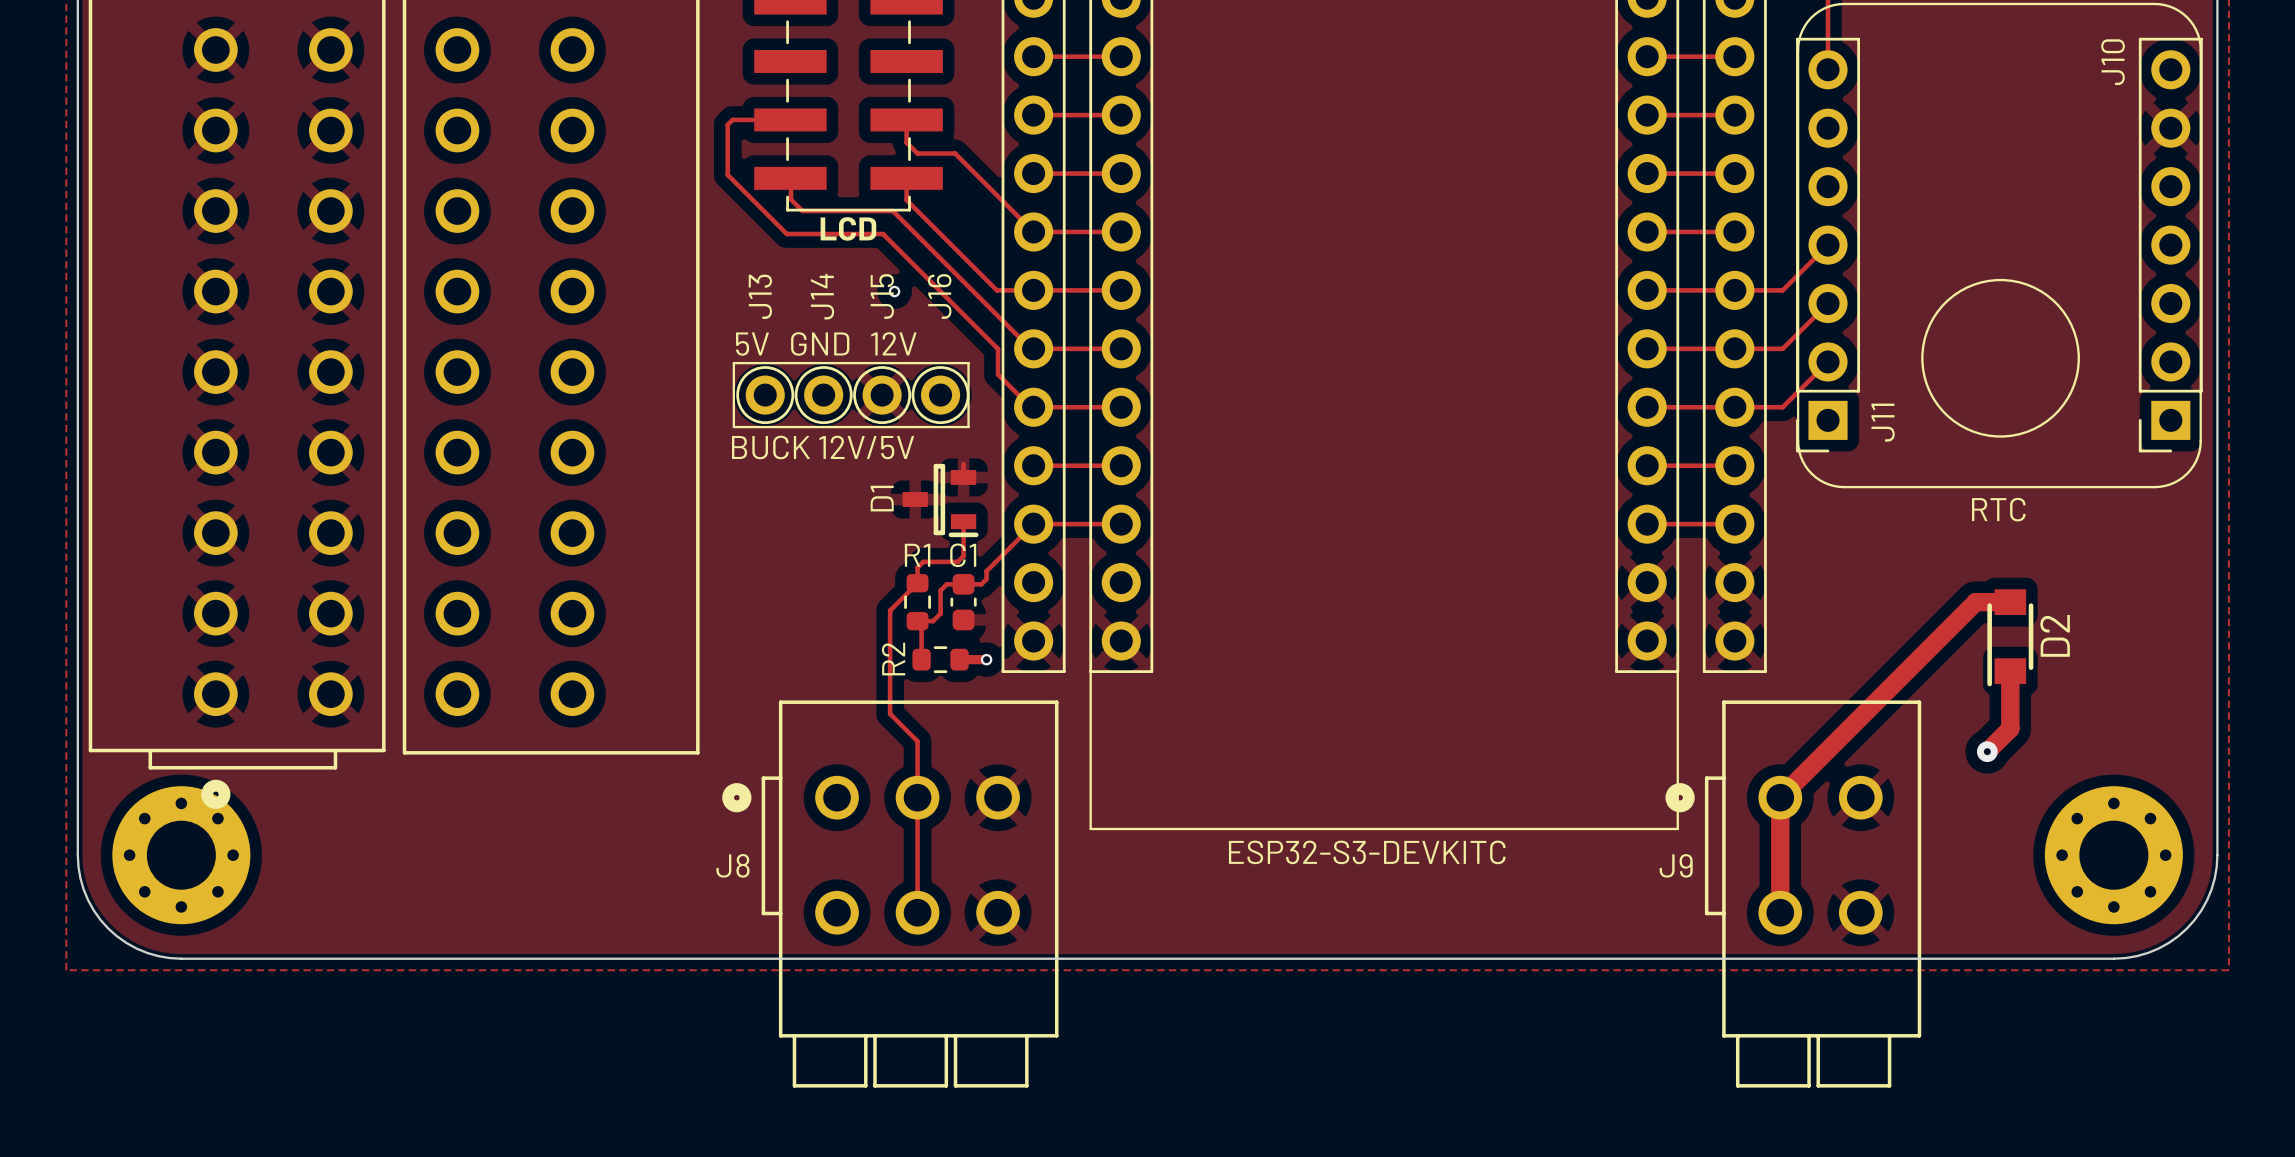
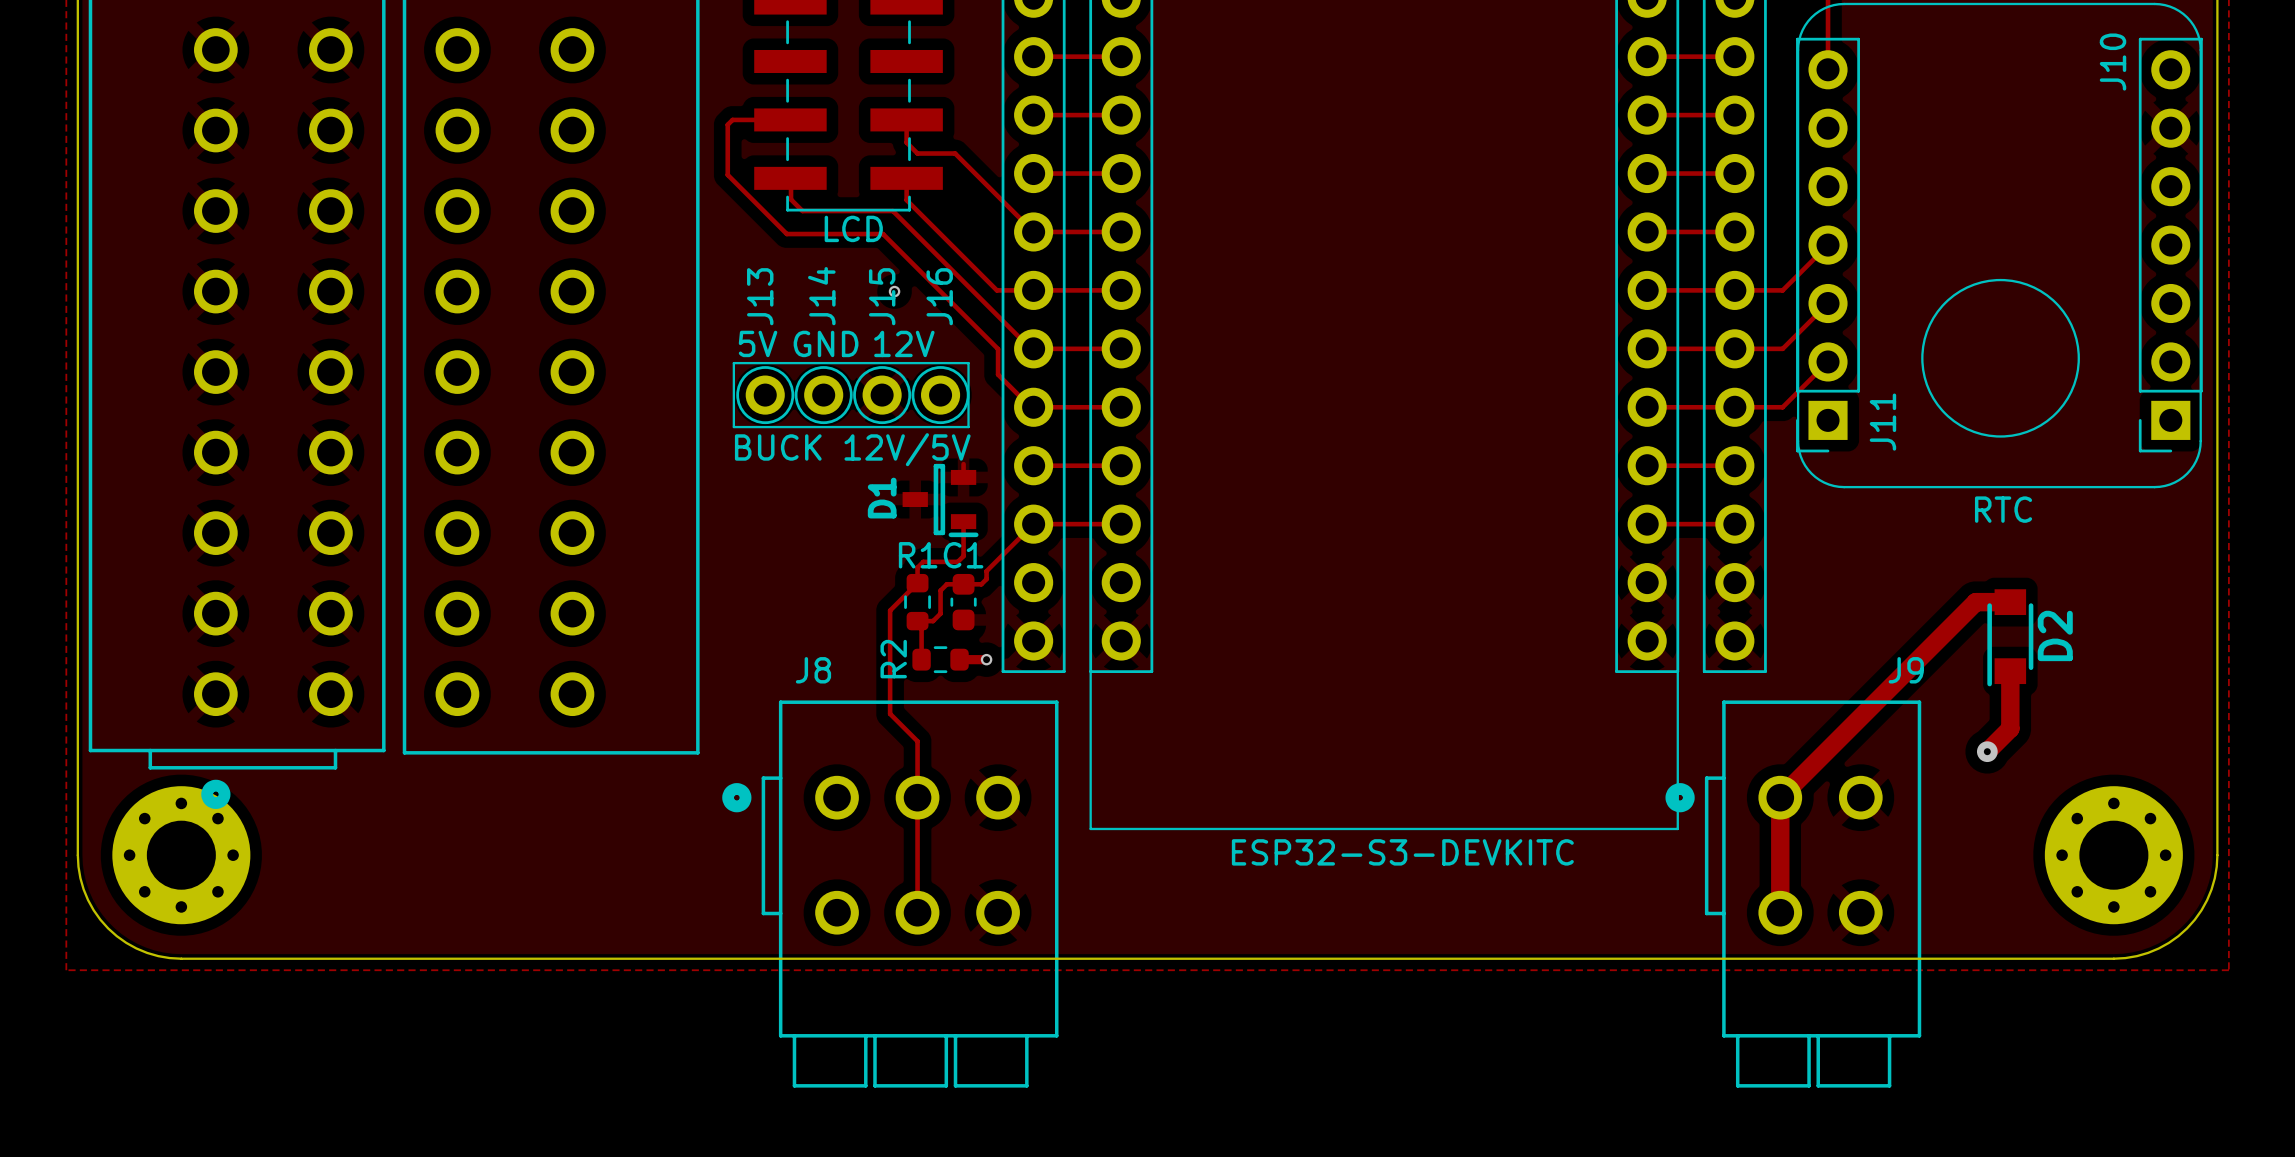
J8 name position: J8 (732, 865) -> J8 (813, 670)
J9 name position: J9 (1676, 865) -> J9 (1906, 670)

